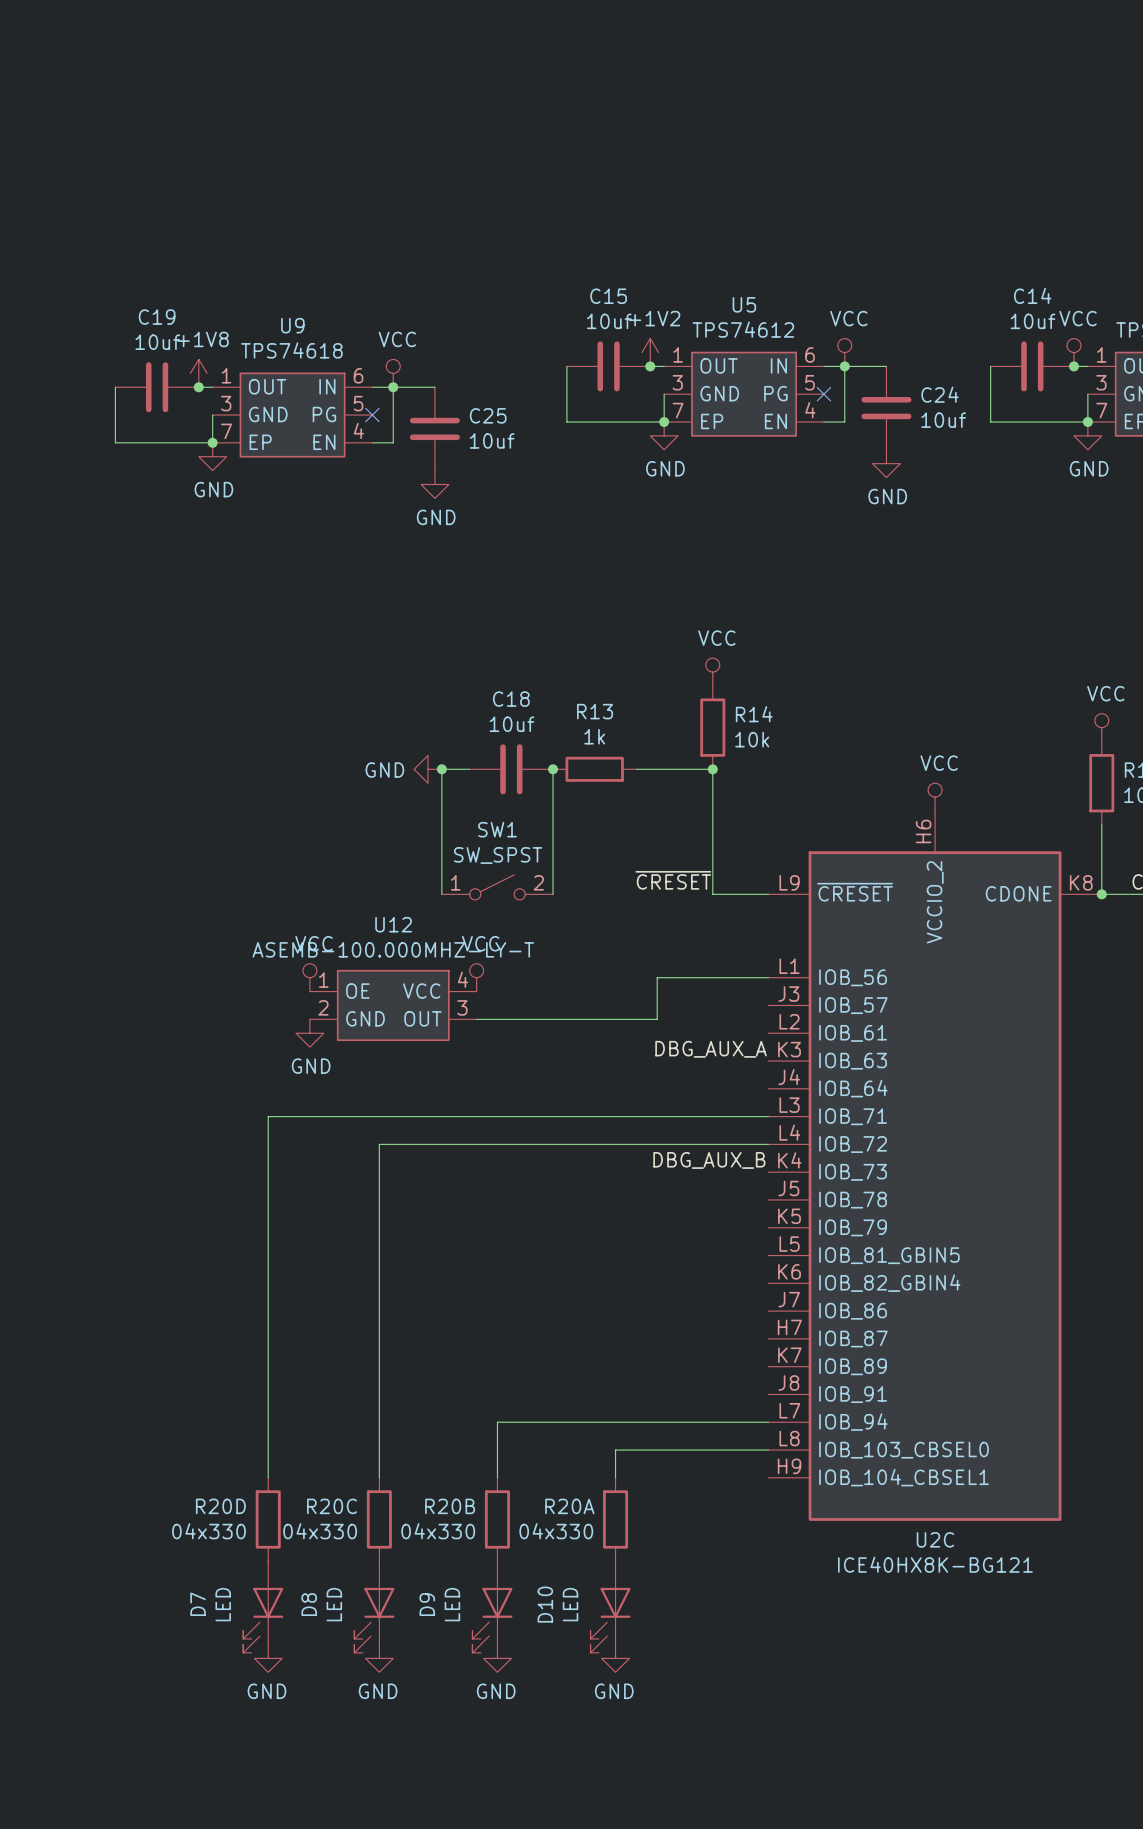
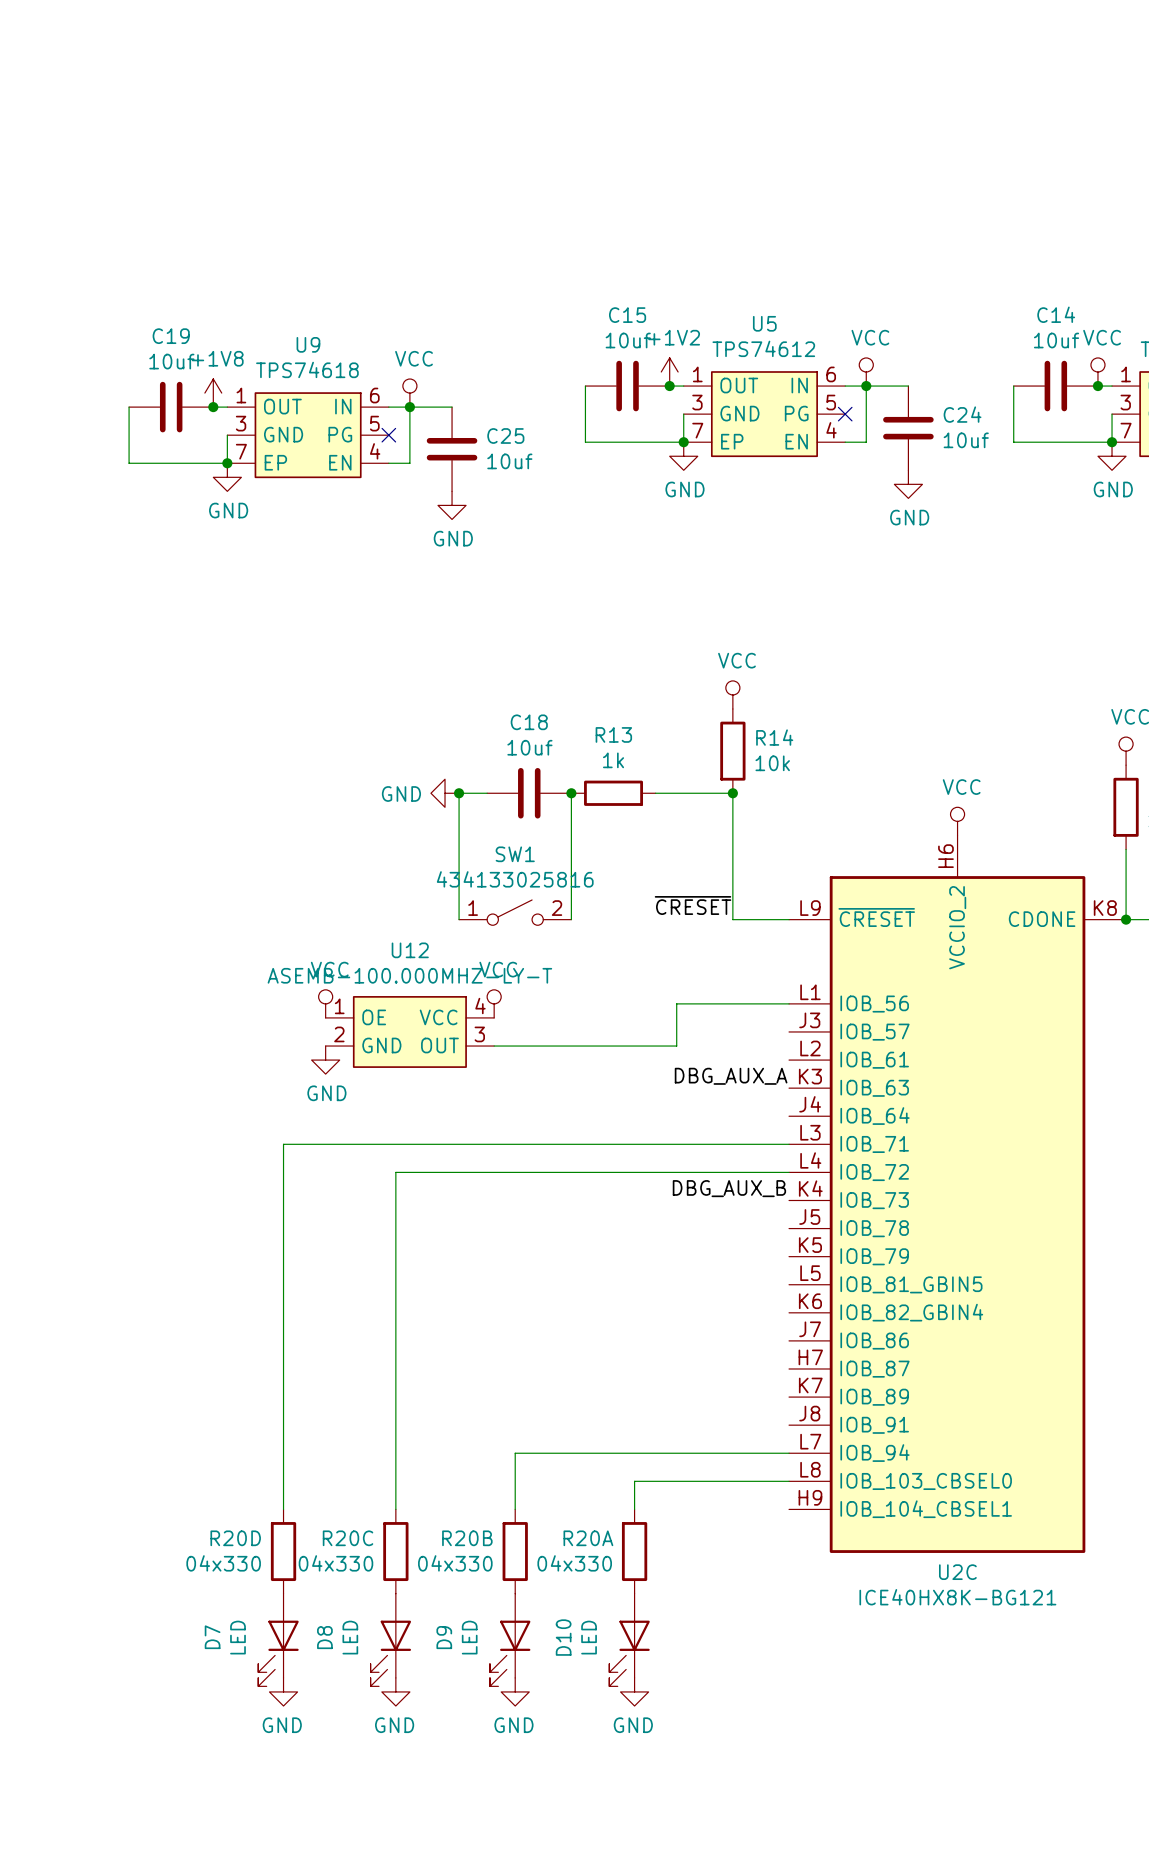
SW1 value: SW_SPST (498, 855) -> 434133025816 (515, 879)

